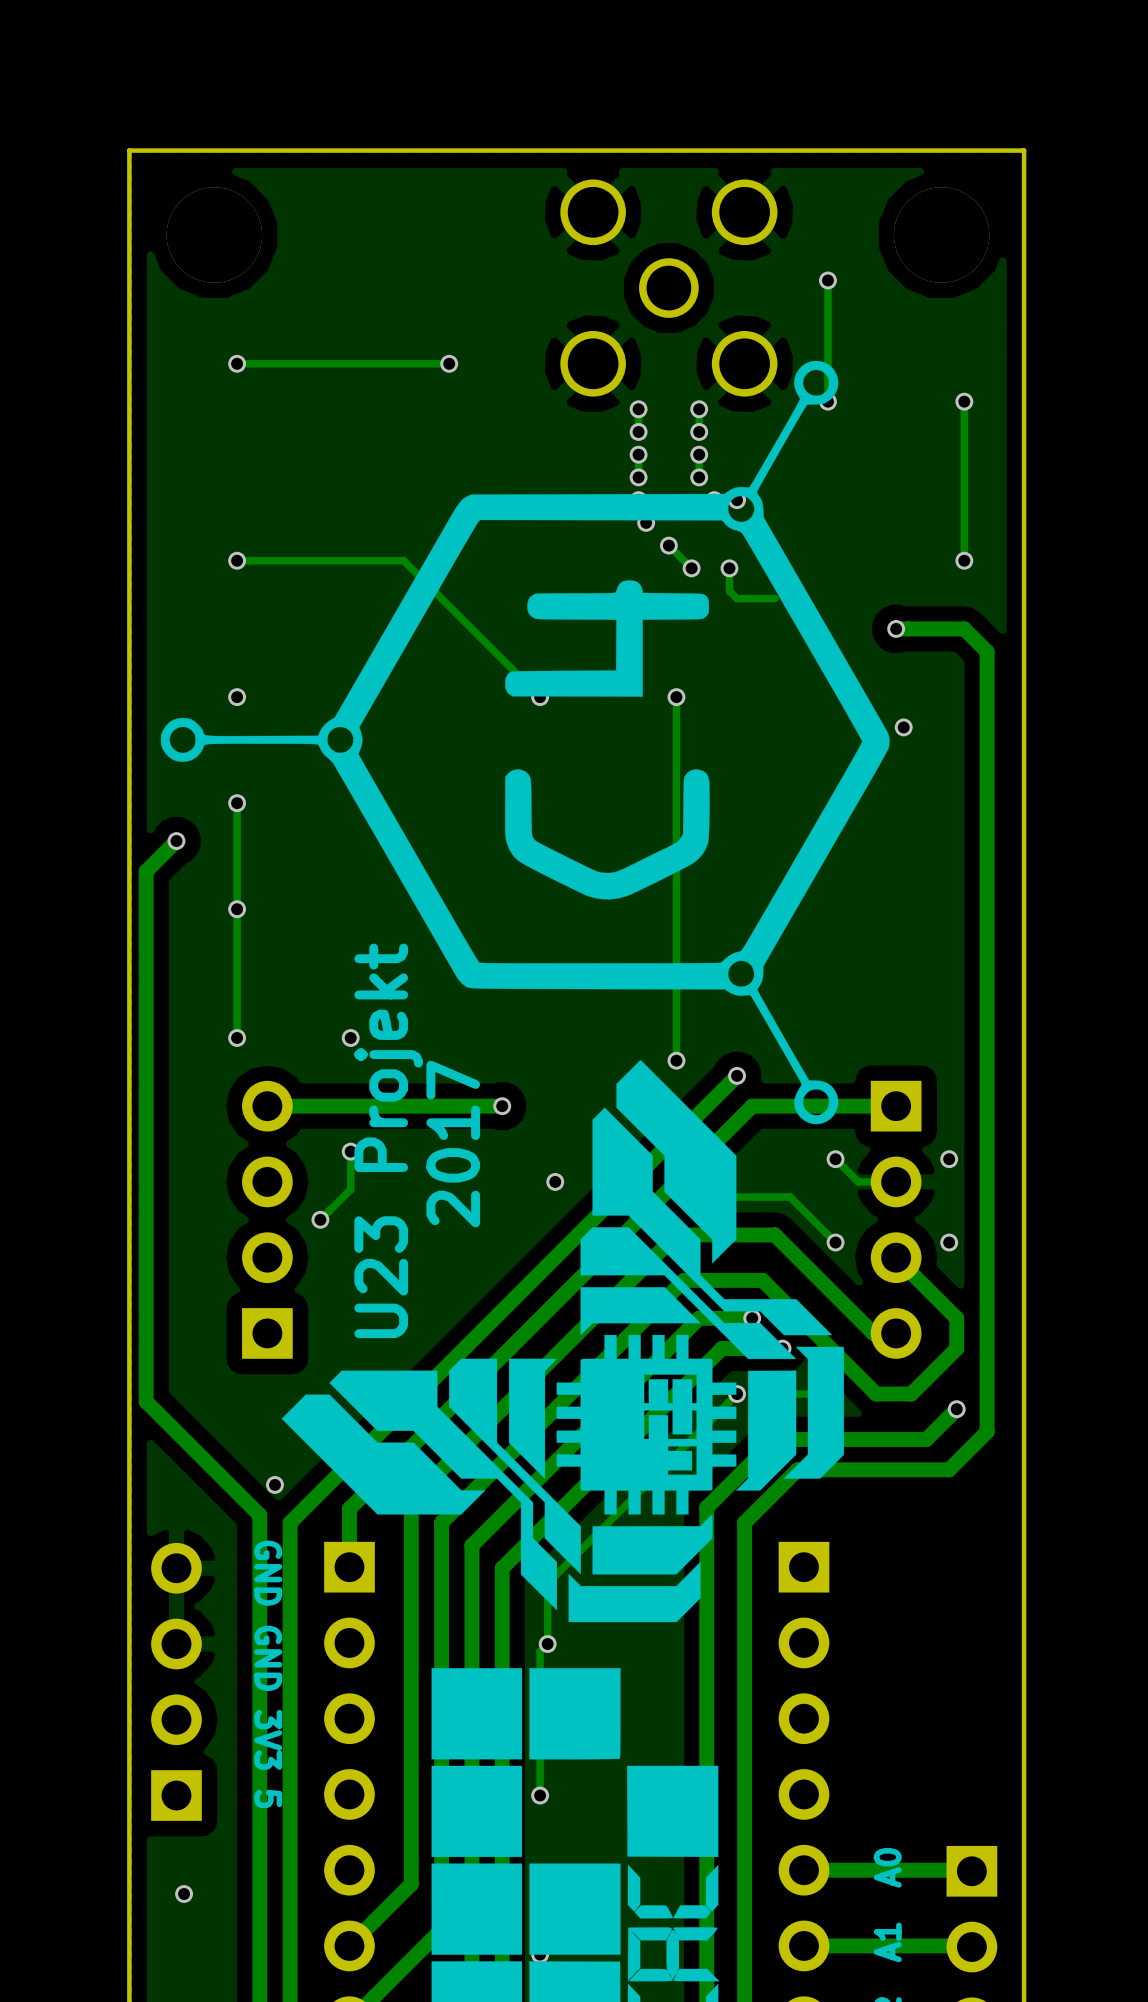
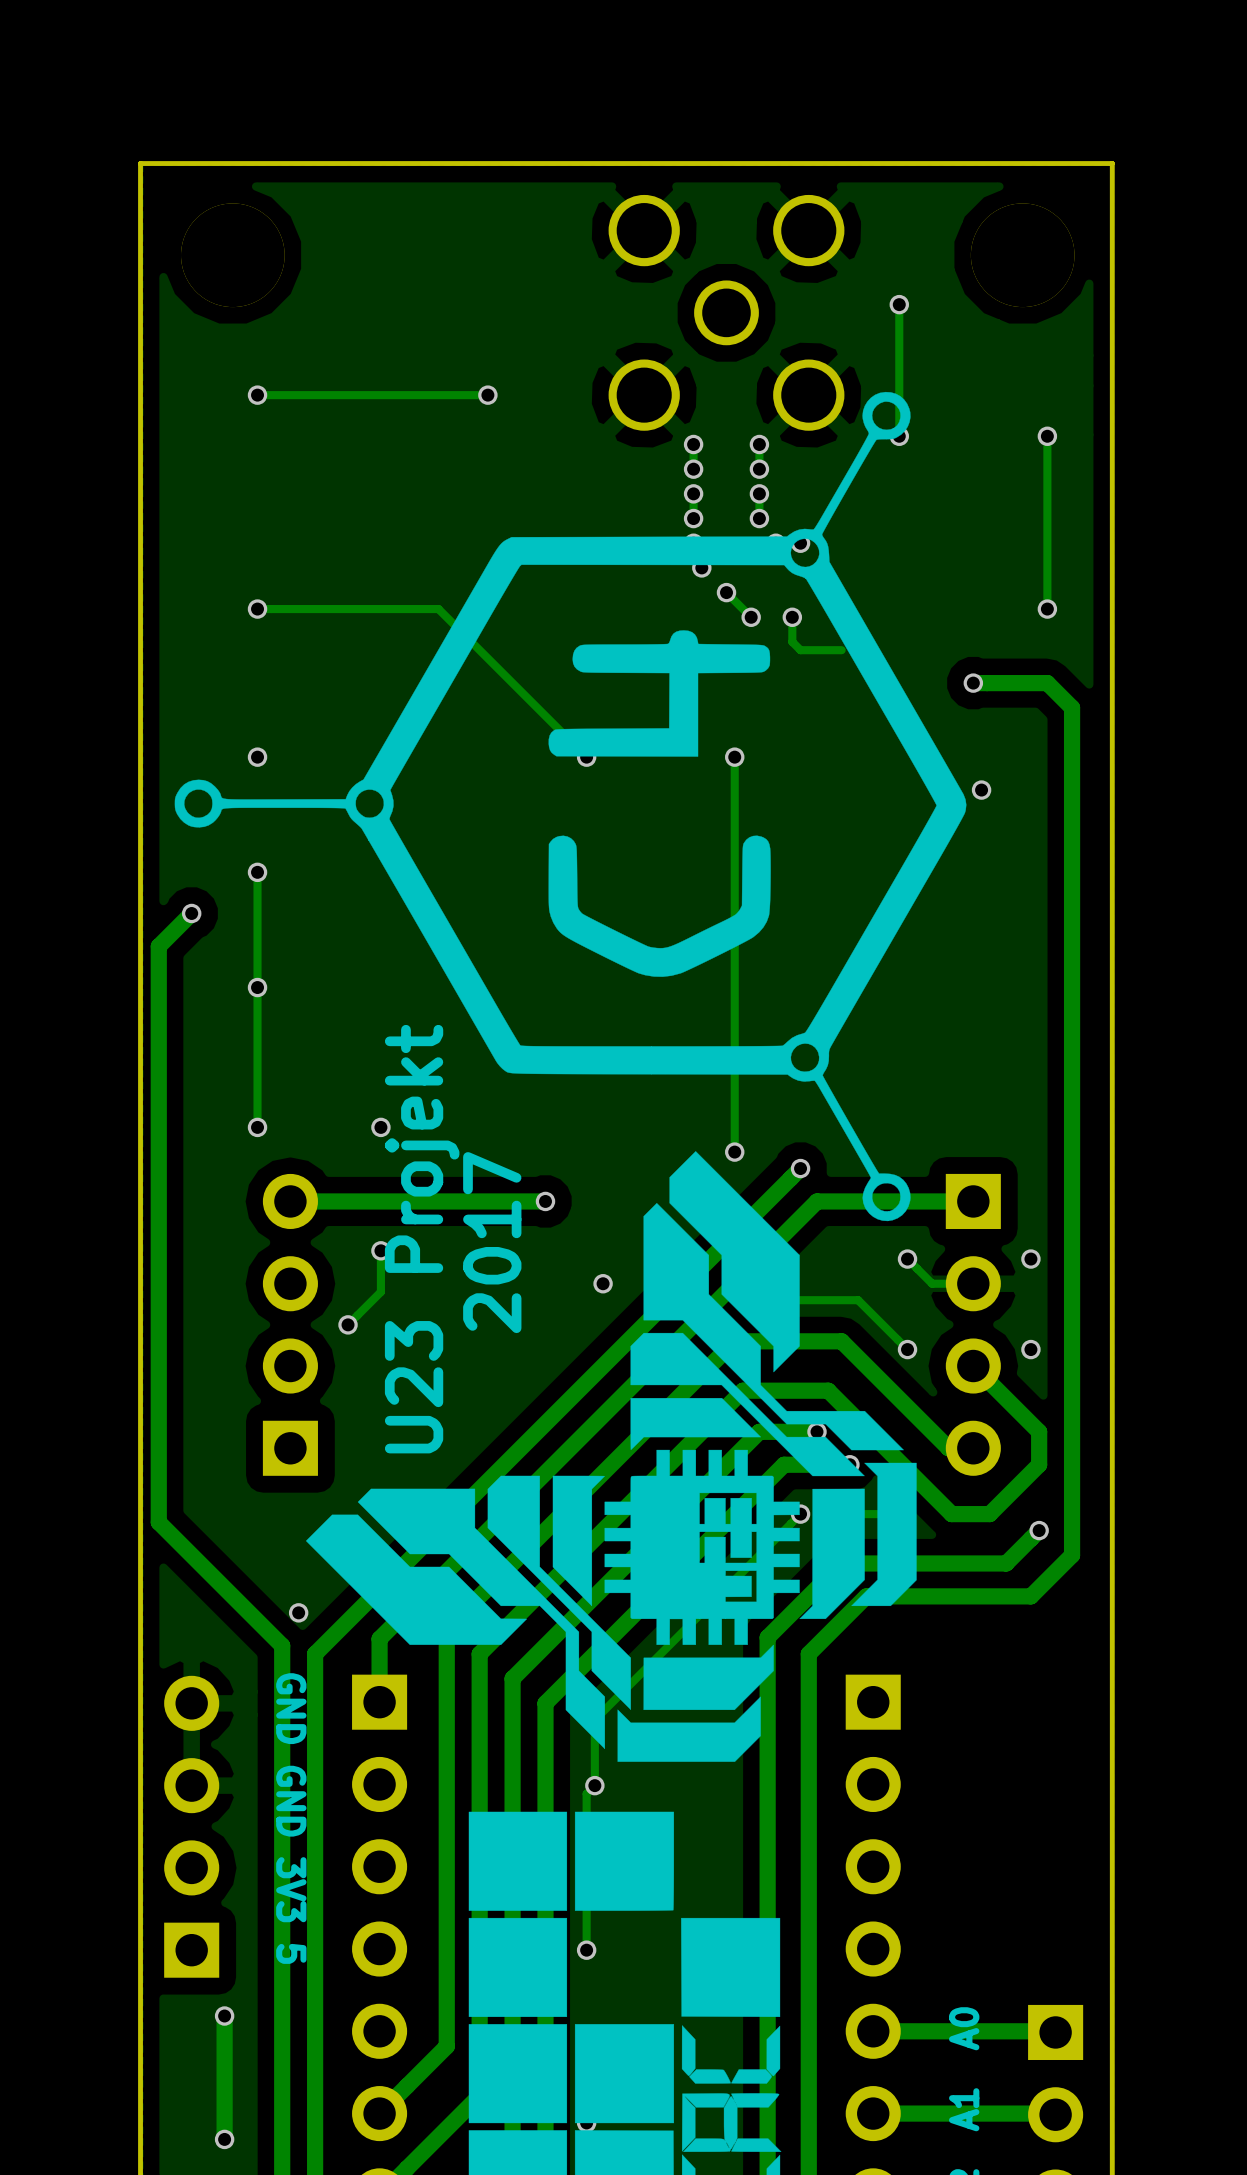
track: none -> (224, 2016) (224, 2139)
via: none -> (224, 2016)
via: (184, 1894) -> none
via: none -> (224, 2139)

